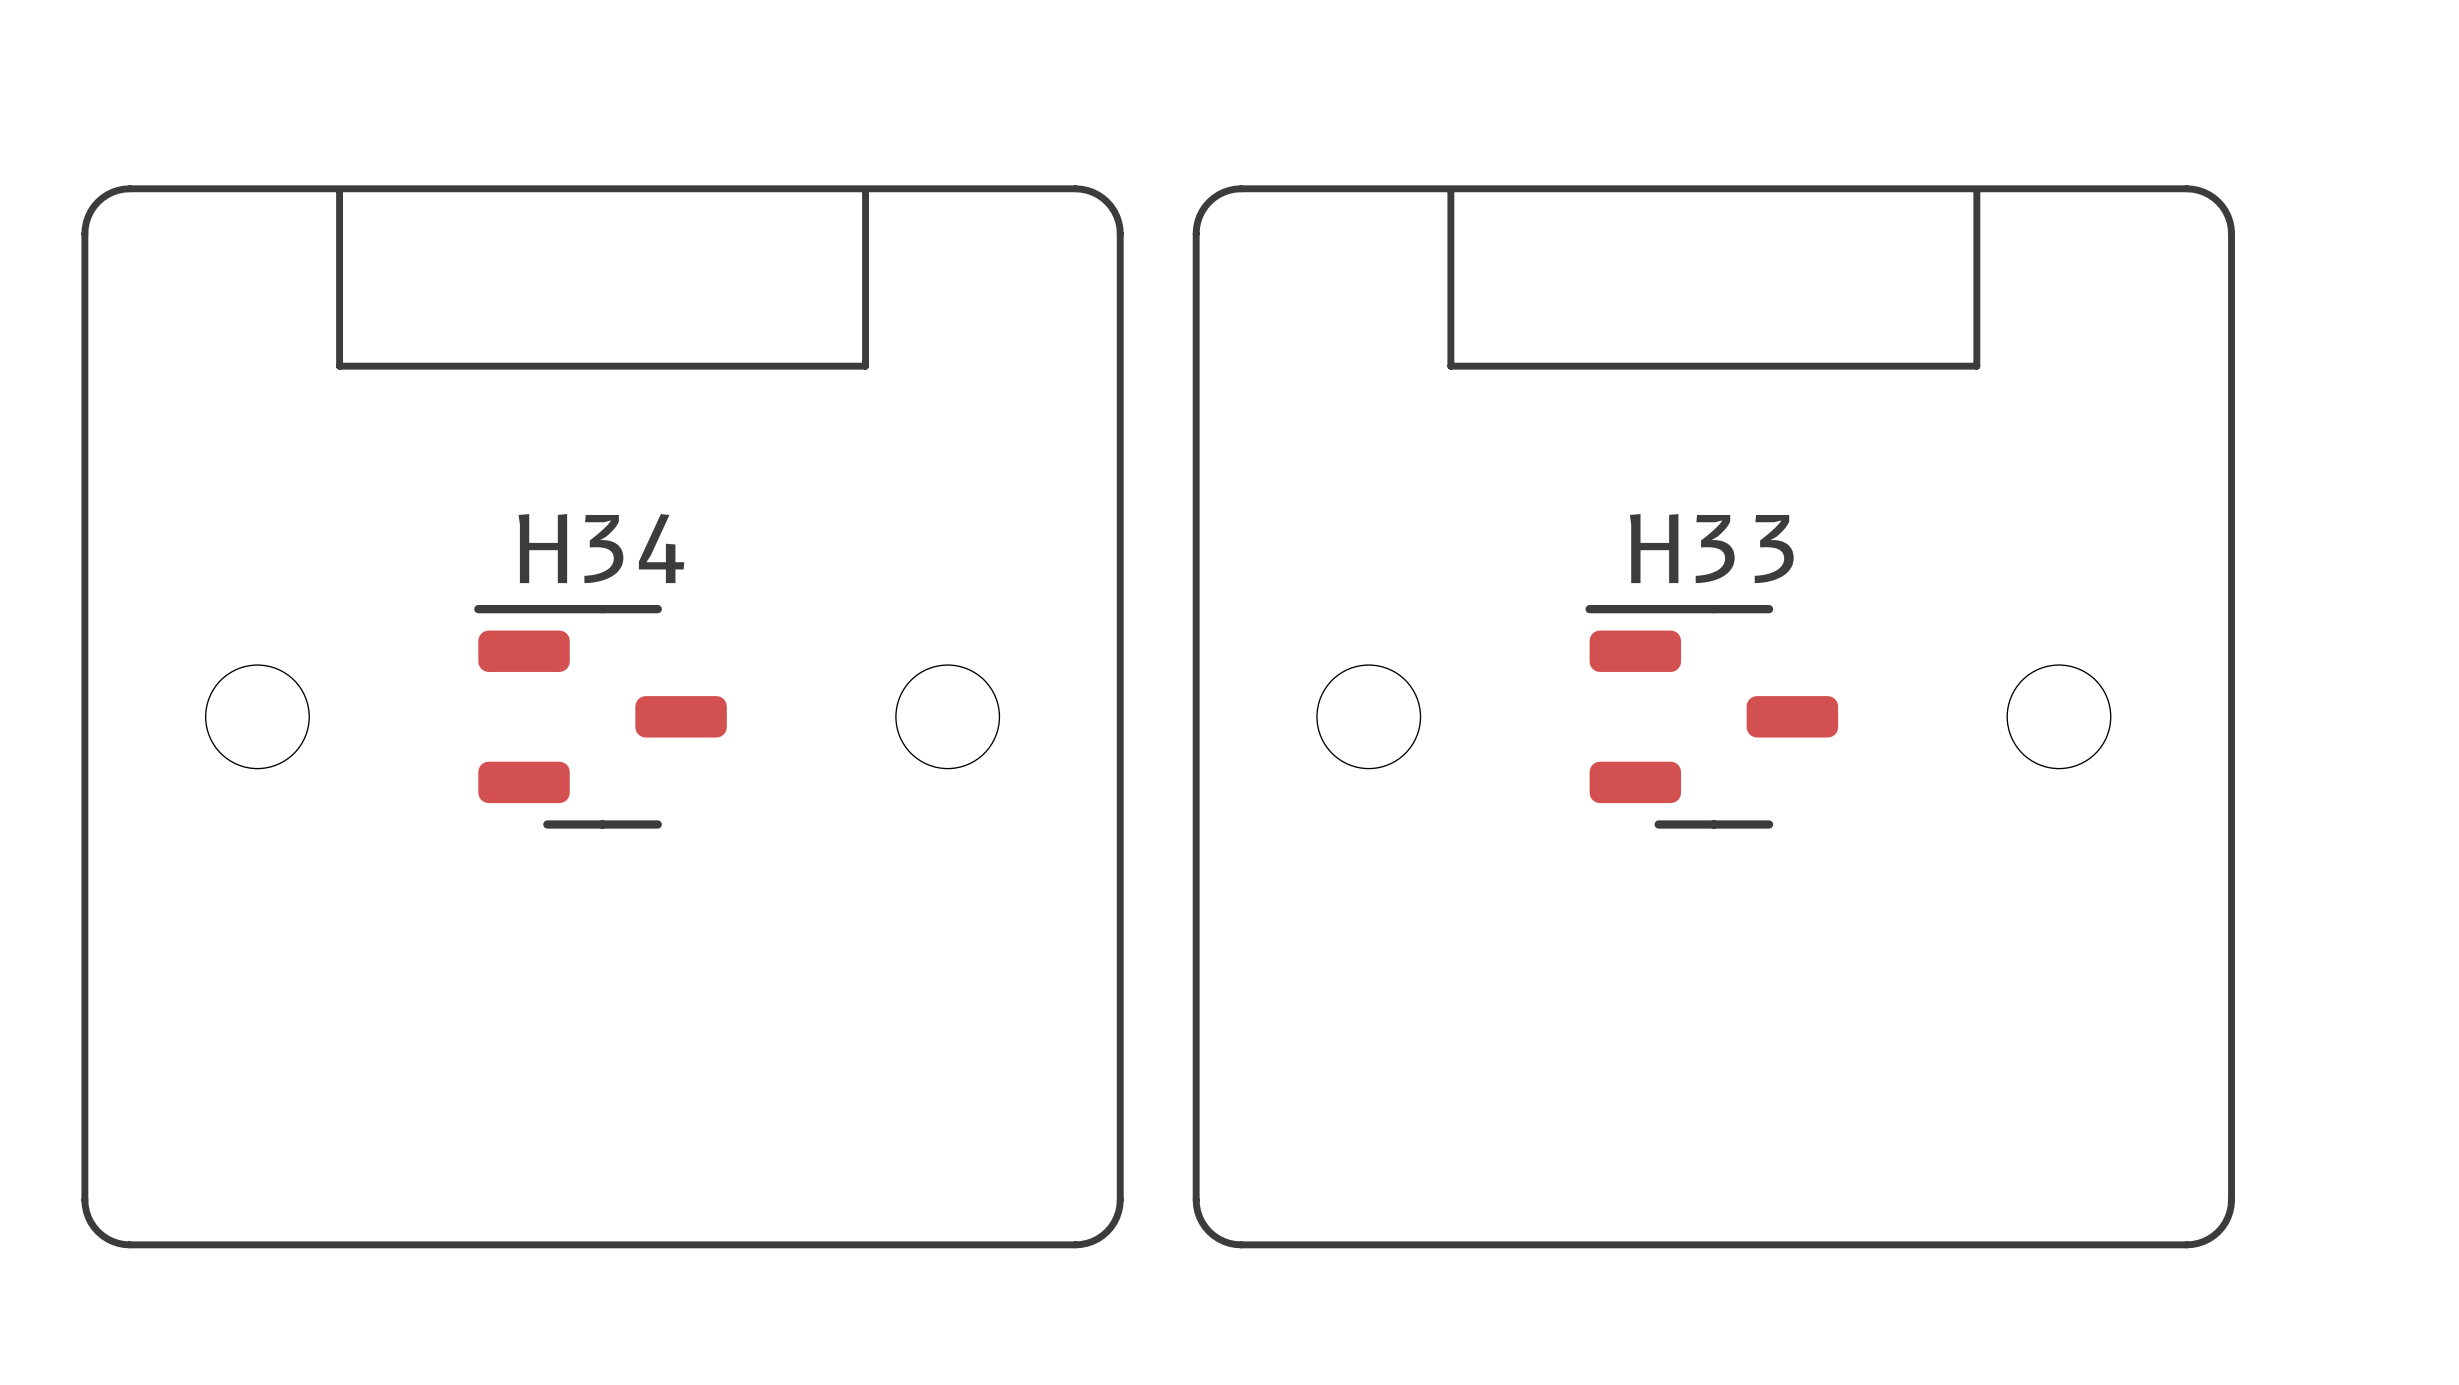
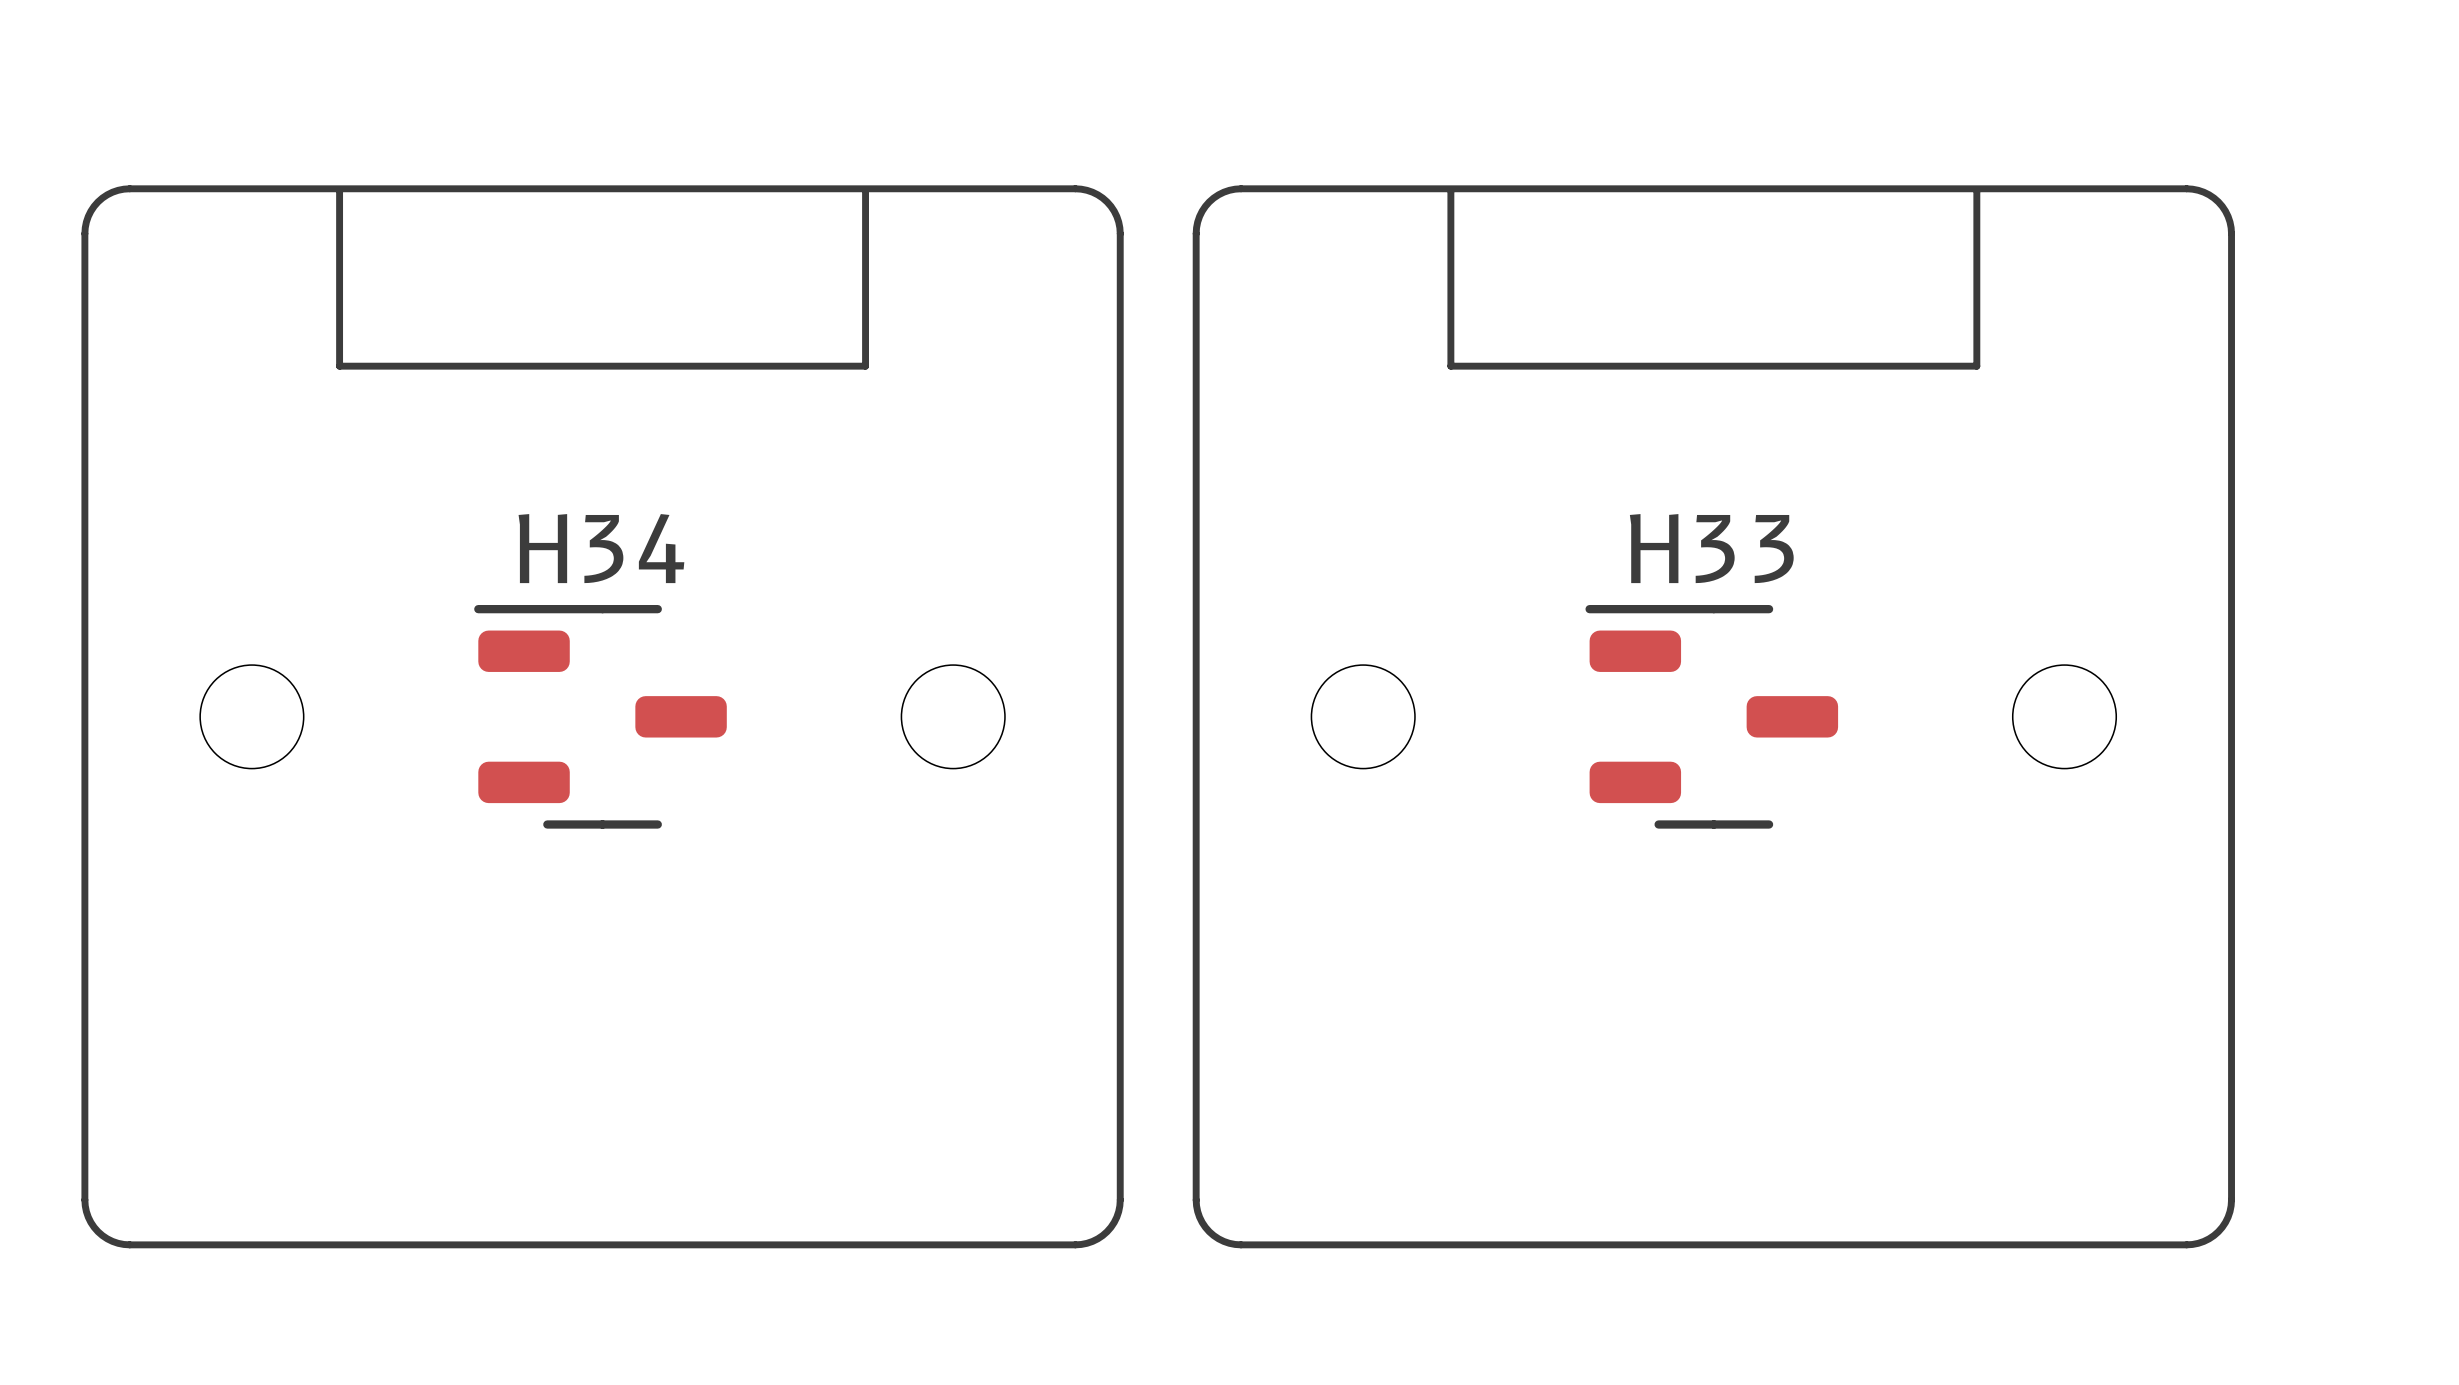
H34 footprint: [81, 185, 1124, 1249] -> [81, 185, 1124, 1249]
H33 footprint: [1192, 185, 2235, 1249] -> [1192, 185, 2235, 1249]

